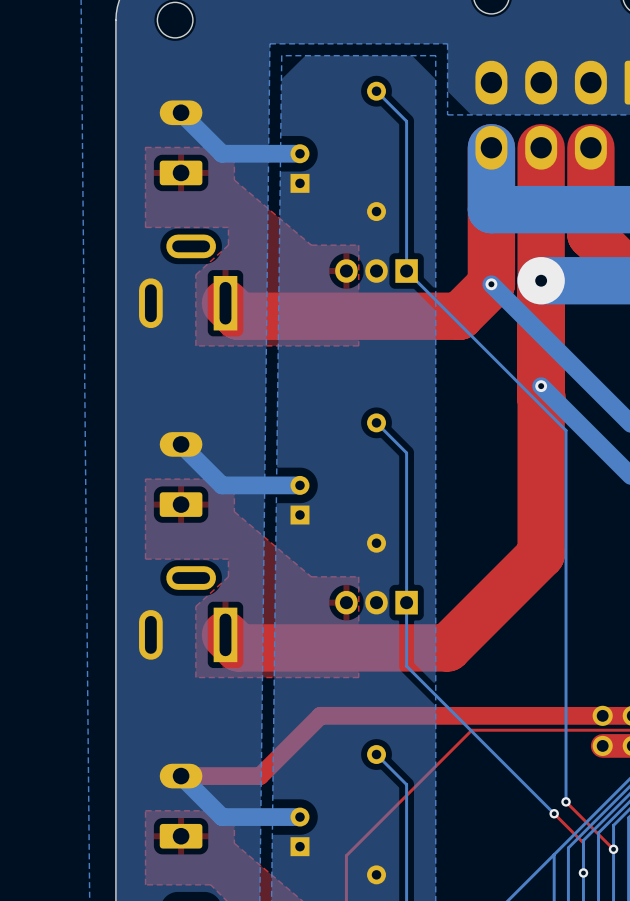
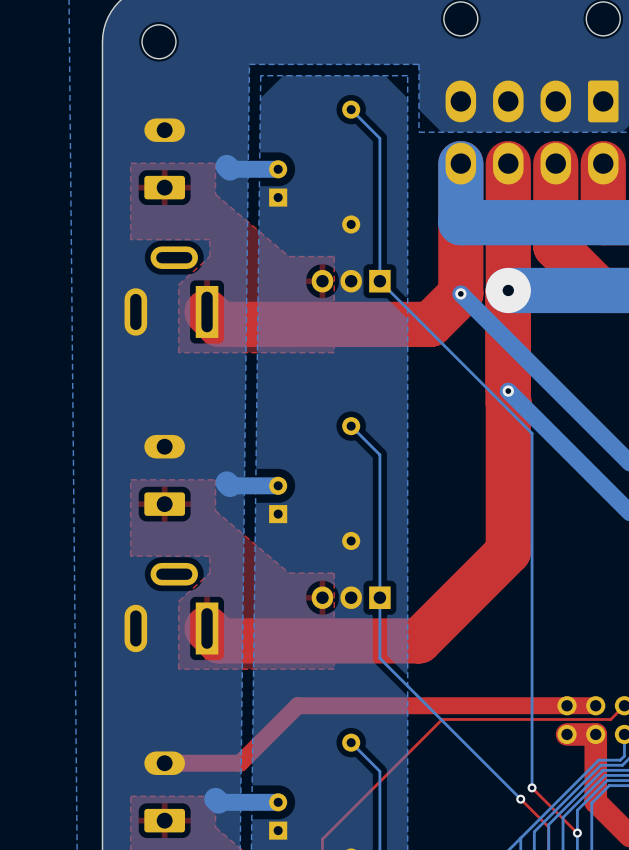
bottom track: (181, 112) (222, 153) (249, 153) -> (226, 166) (230, 169)
bottom track: (181, 444) (222, 485) (249, 485) -> (226, 482) (230, 485)
bottom track: (181, 776) (222, 817) (237, 817) -> (215, 799) (218, 802)

